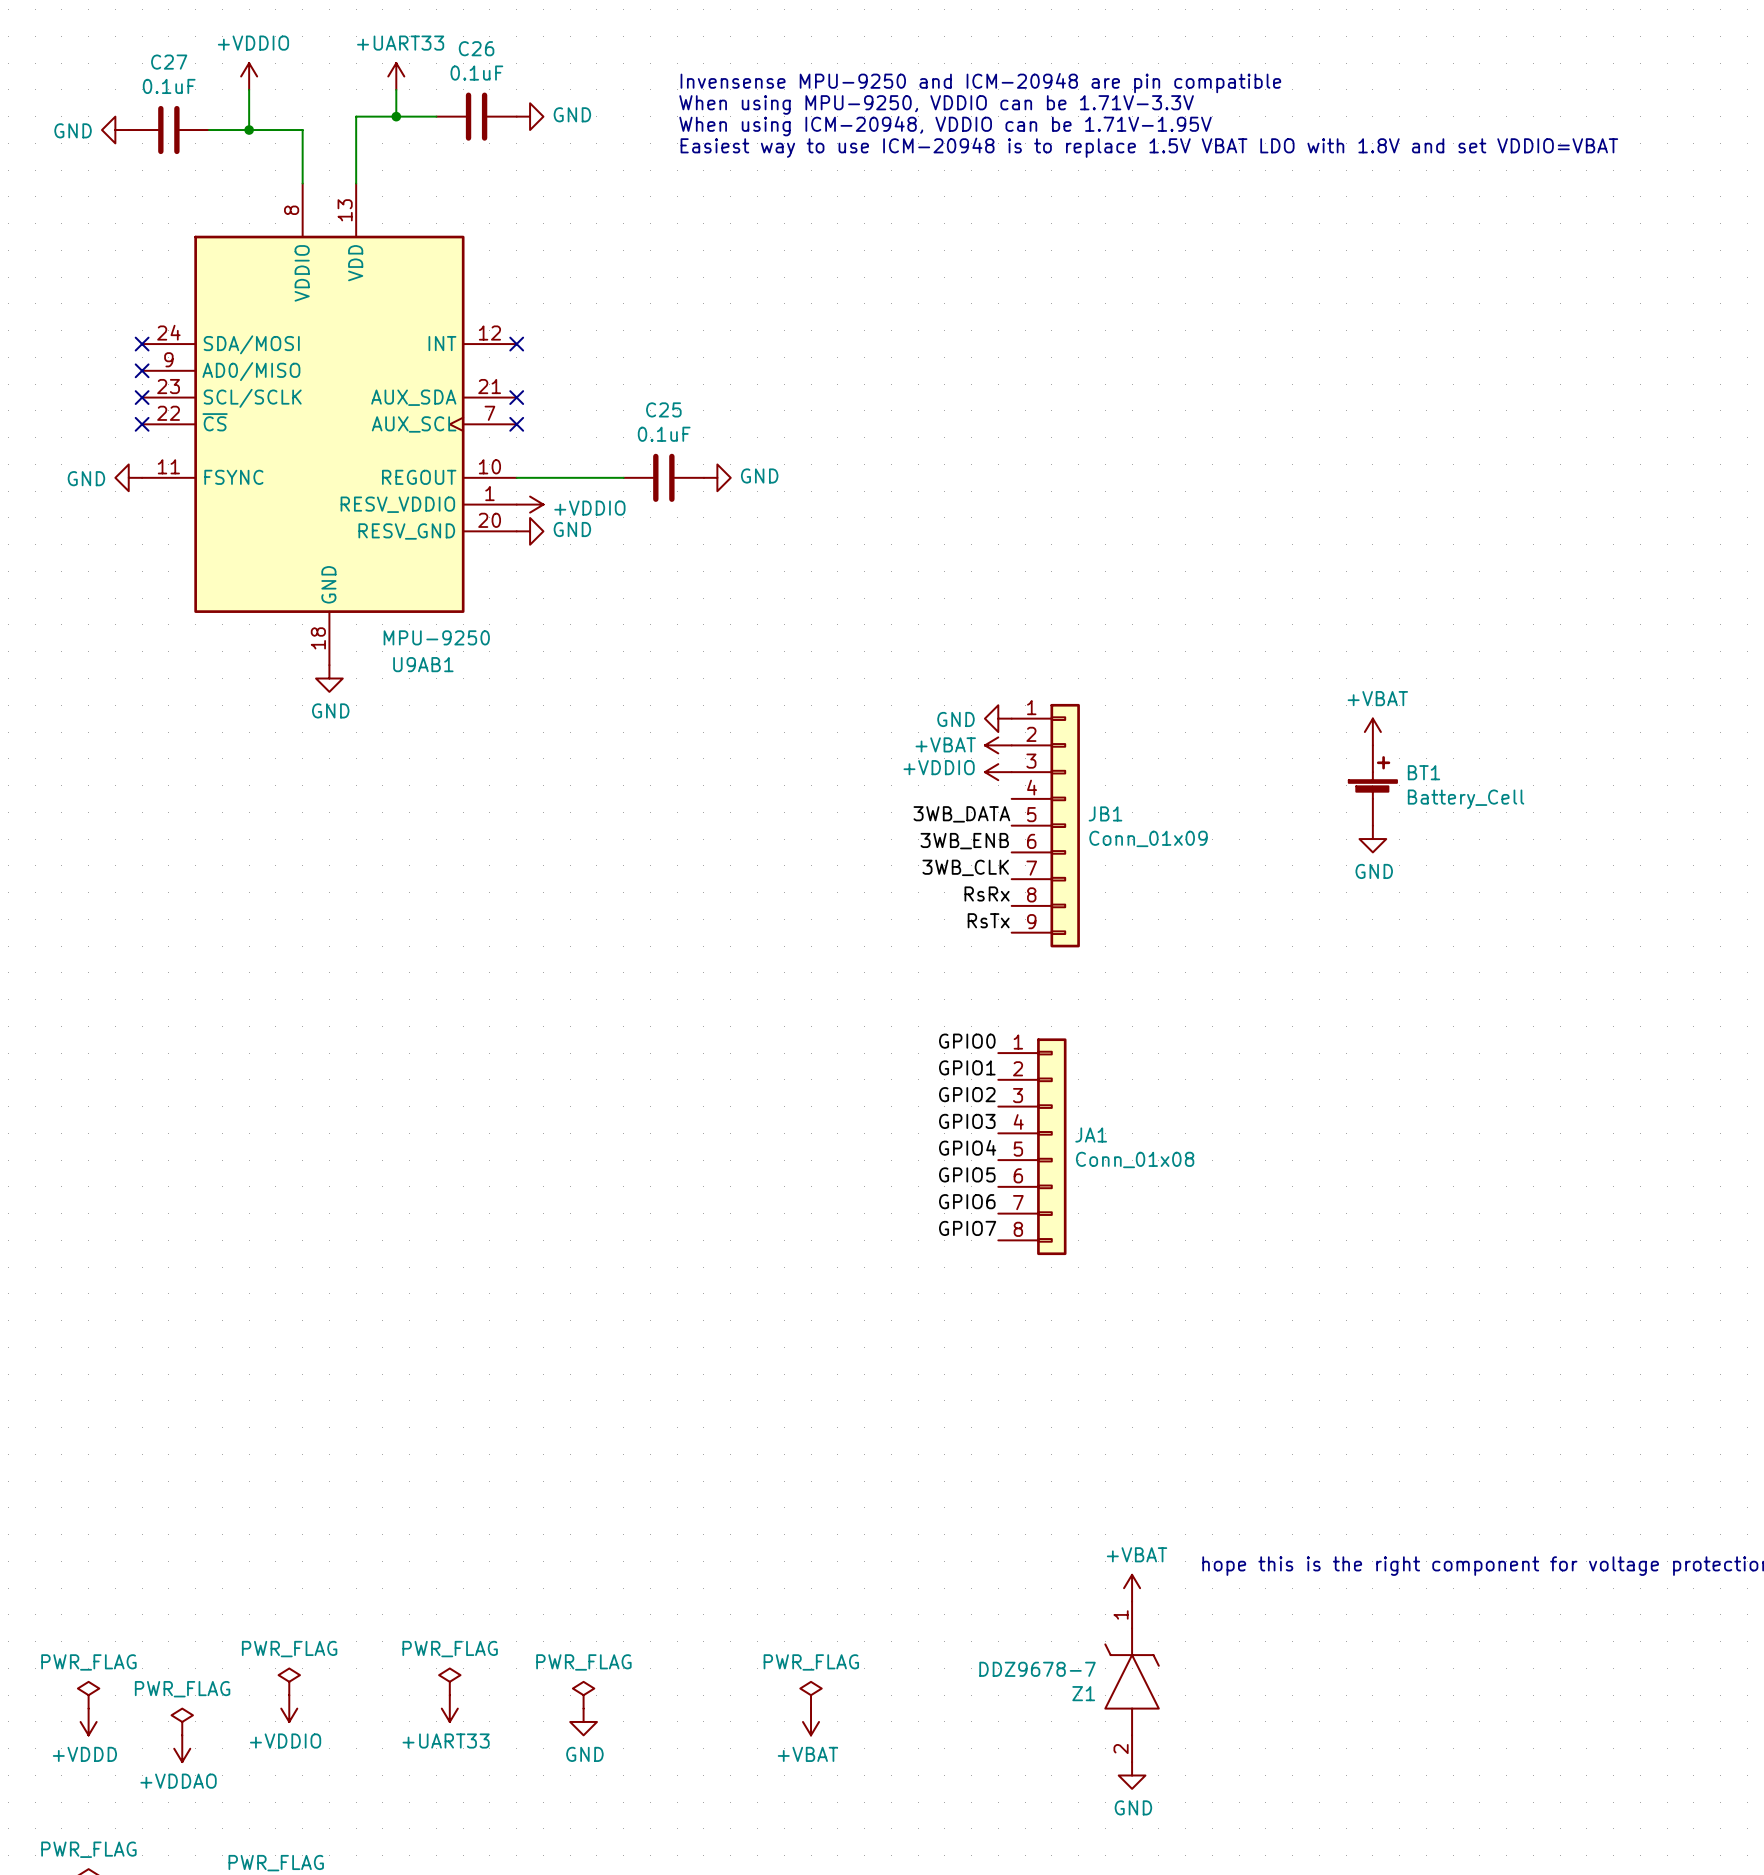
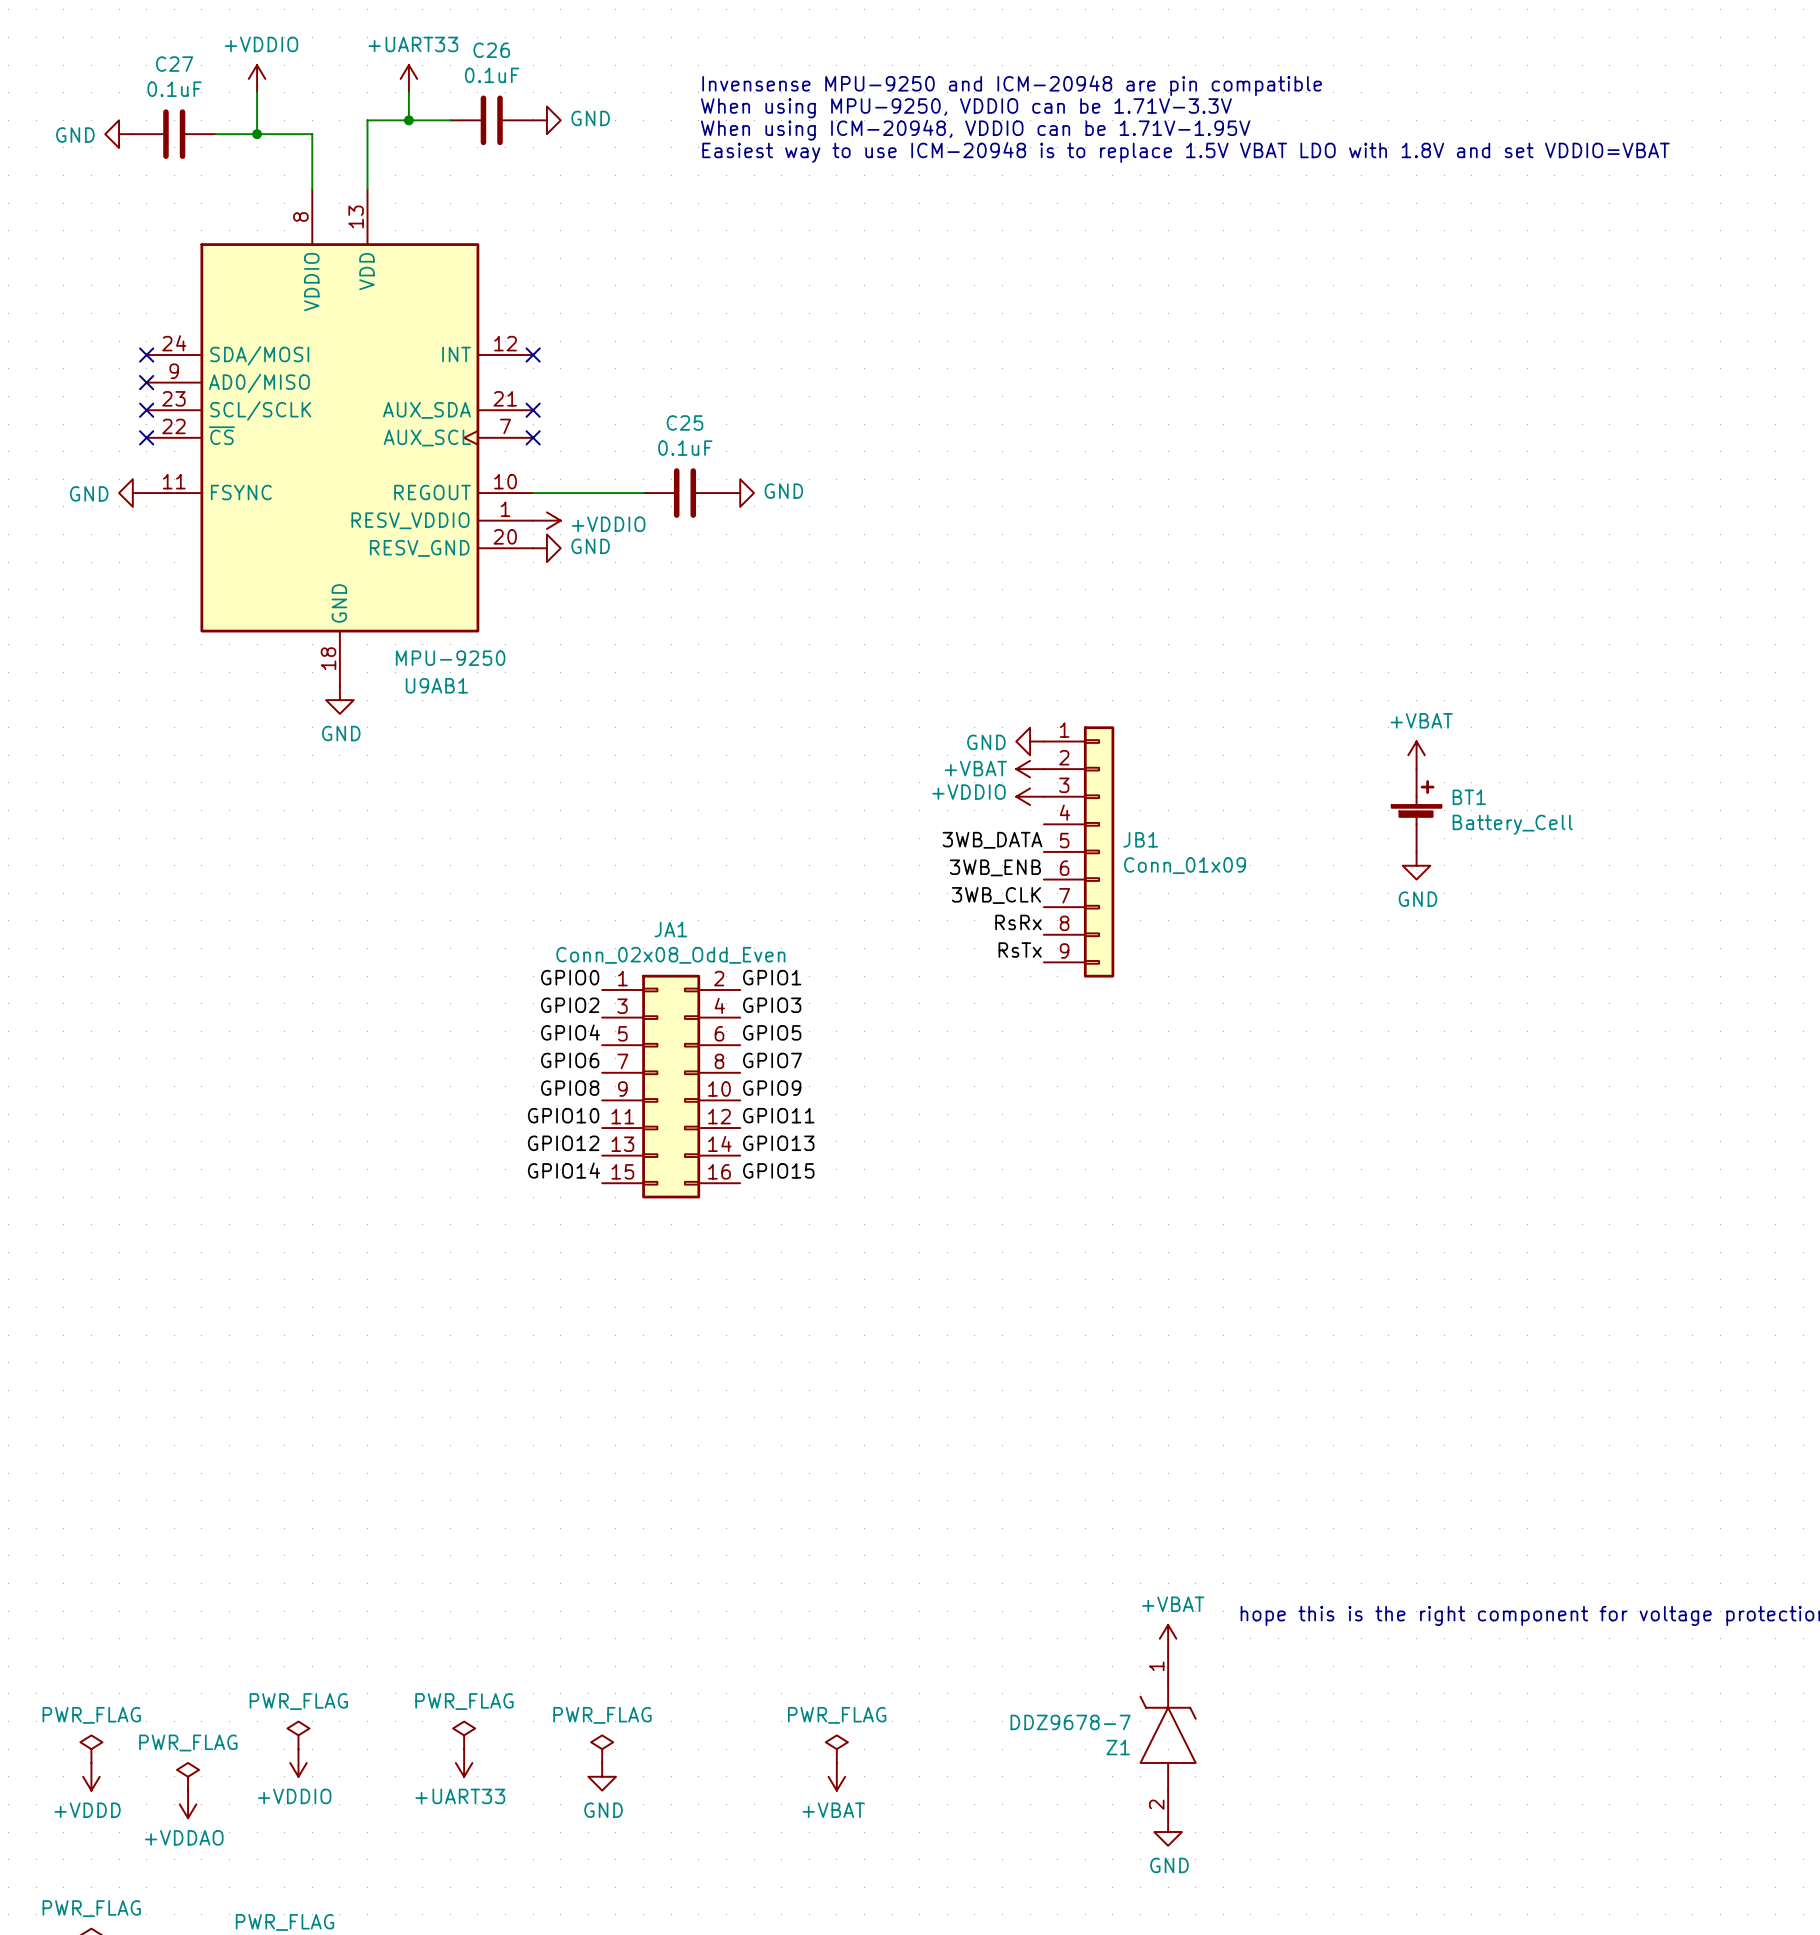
label: none -> GPIO0 (570, 977)
label: none -> GPIO1 (772, 977)
label: none -> GPIO2 (570, 1005)
label: none -> GPIO3 (772, 1005)
label: none -> GPIO4 (570, 1032)
label: none -> GPIO5 (772, 1032)
label: none -> GPIO6 (570, 1060)
label: none -> GPIO7 (772, 1060)
JA1 symbol: [998, 1038, 1067, 1256] -> [602, 974, 741, 1199]
label: GPIO0 (967, 1041) -> none
label: none -> GPIO8 (570, 1088)
label: none -> GPIO9 (772, 1088)
label: GPIO1 (967, 1067) -> none
label: none -> GPIO10 (563, 1115)
label: none -> GPIO11 (778, 1115)
label: GPIO2 (967, 1094) -> none
label: none -> GPIO12 (563, 1143)
label: none -> GPIO13 (778, 1143)
label: GPIO3 (967, 1121) -> none
label: none -> GPIO14 (563, 1170)
label: none -> GPIO15 (778, 1170)
JA1 name position: JA1 (1091, 1134) -> JA1 (670, 929)
label: GPIO4 (967, 1147) -> none
JA1 value: Conn_01x08 (1135, 1159) -> Conn_02x08_Odd_Even (670, 955)
label: GPIO5 (967, 1174) -> none
label: GPIO6 (967, 1201) -> none
label: GPIO7 (967, 1228) -> none

